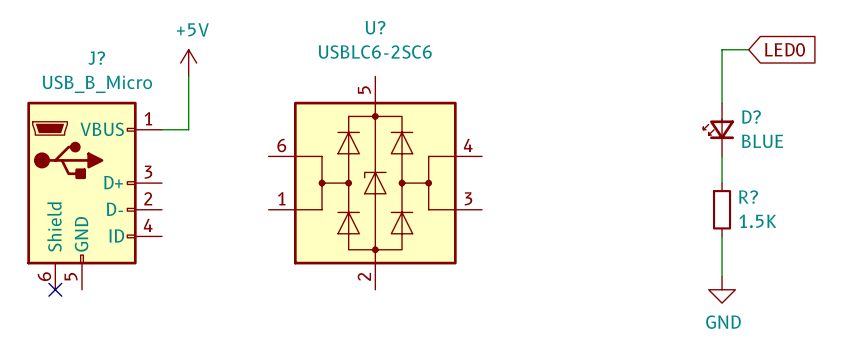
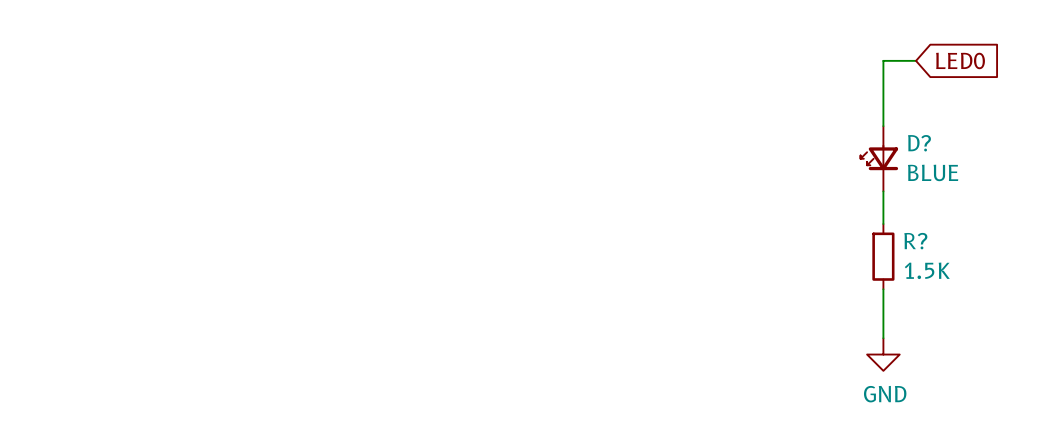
power symbol: +5V (188, 63) -> none
wire: (188, 76) (188, 129) (161, 129) -> none
U?: USBLC6-2SC6 (375, 183) -> none
J?: USB_B_Micro (94, 195) -> none
no-connect mark: (55, 289) -> none

